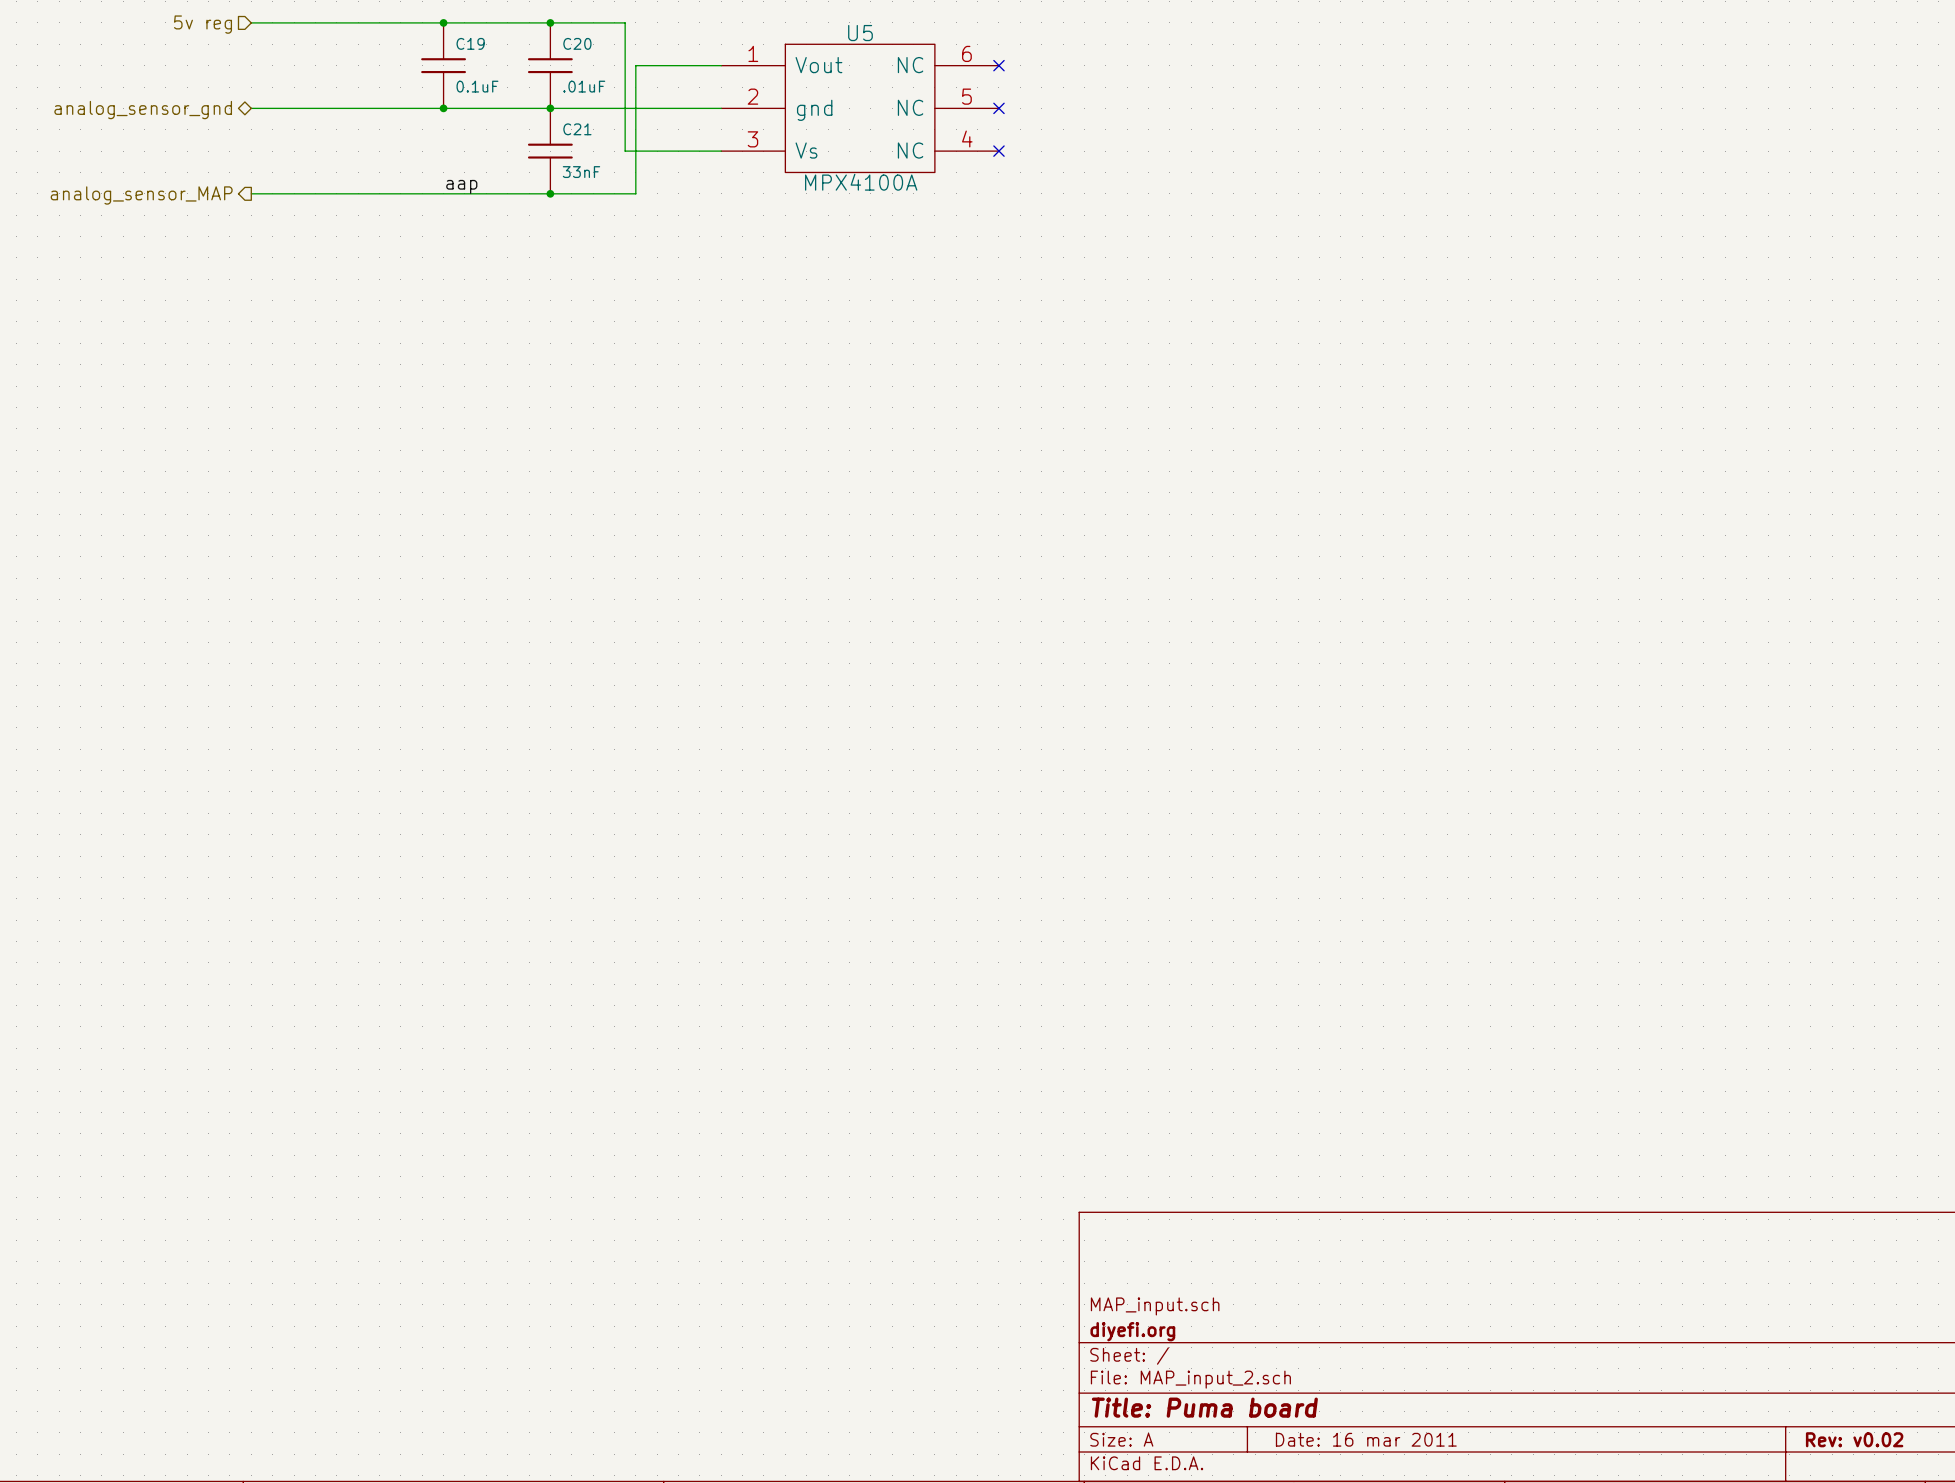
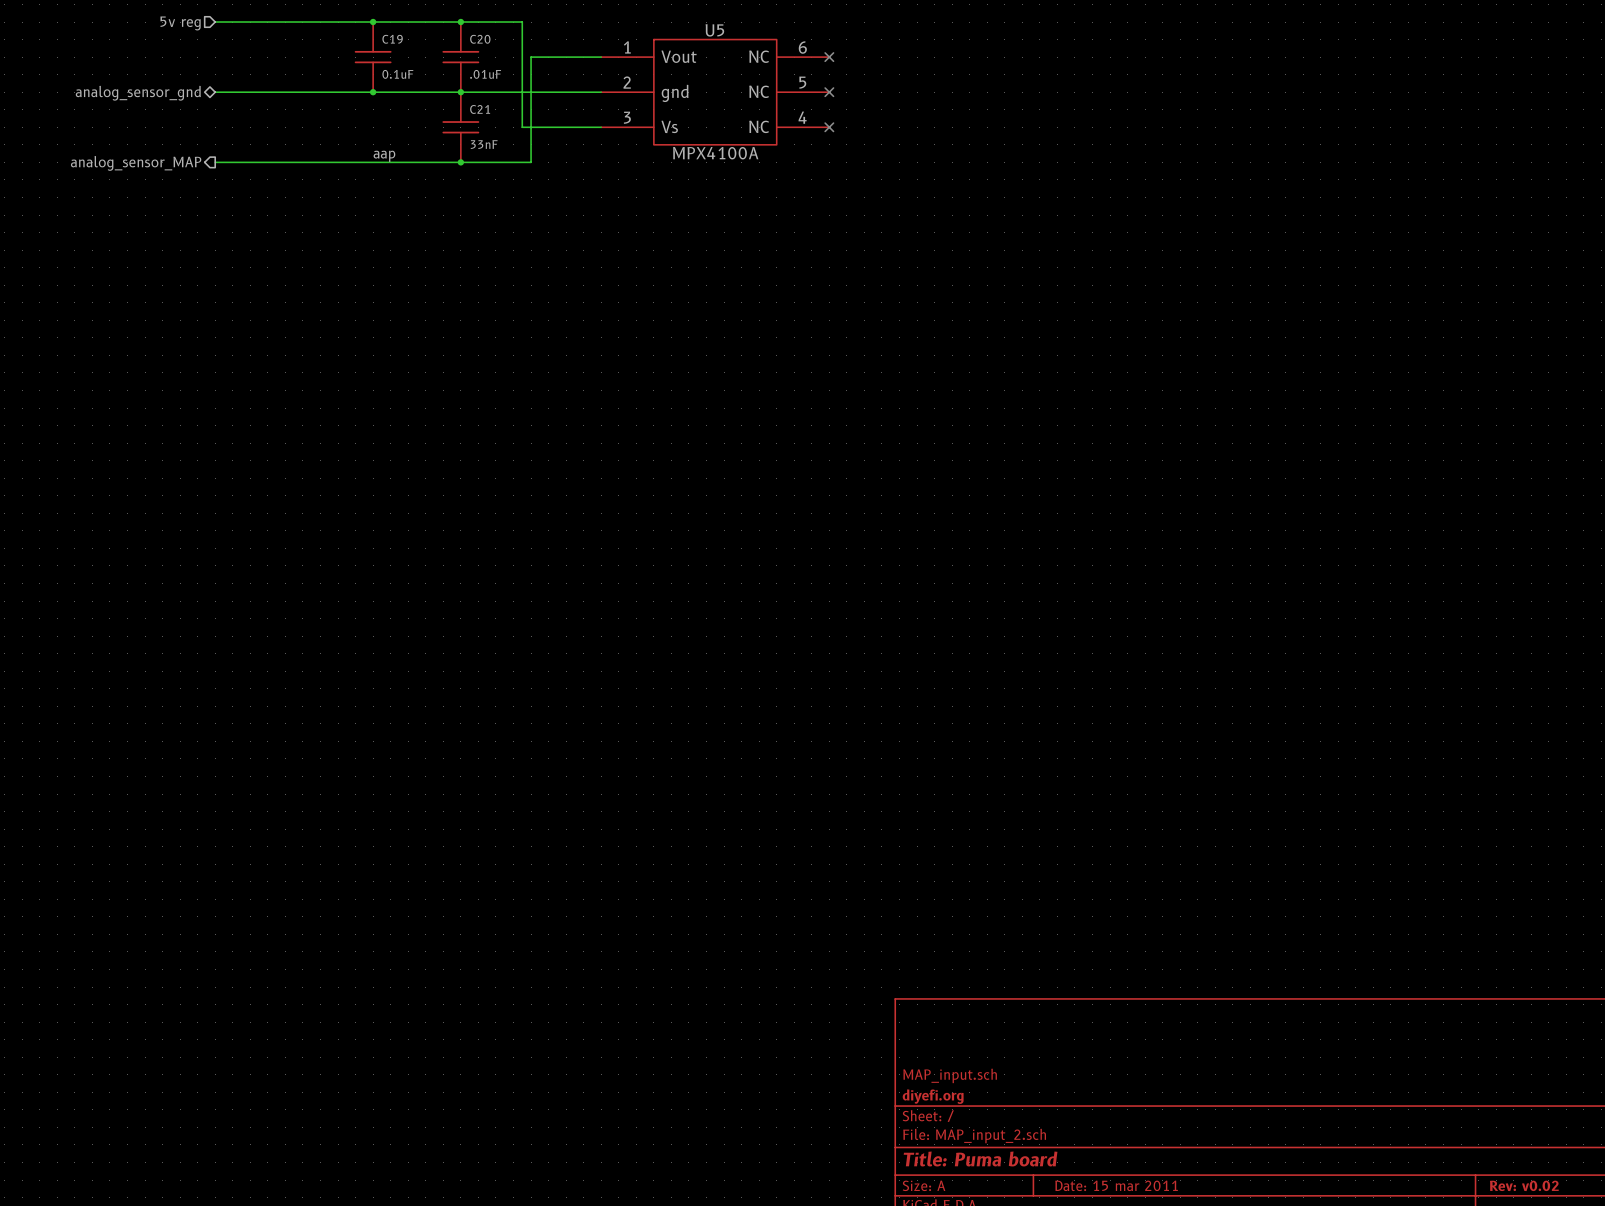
title block: Date: 16 mar 2011 (1366, 1439) -> Date: 15 mar 2011 (1116, 1185)

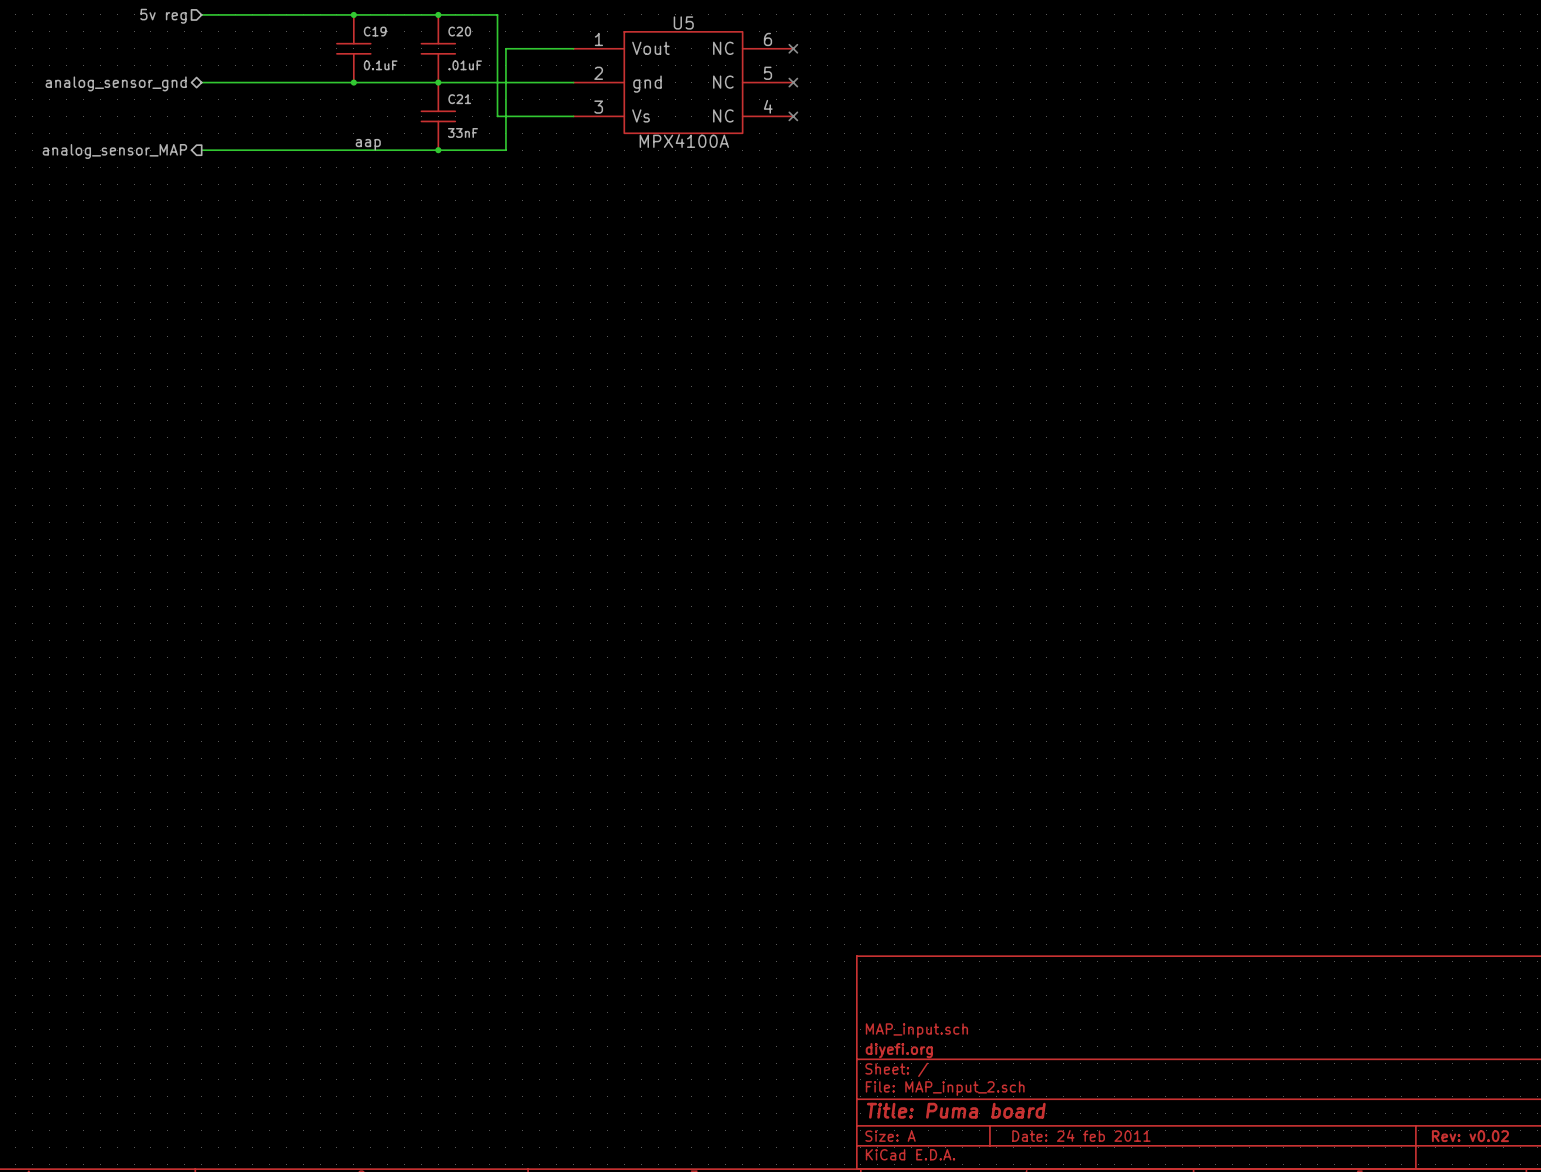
title block: Date: 15 mar 2011 (1116, 1185) -> Date: 24 feb 2011 (1081, 1135)

